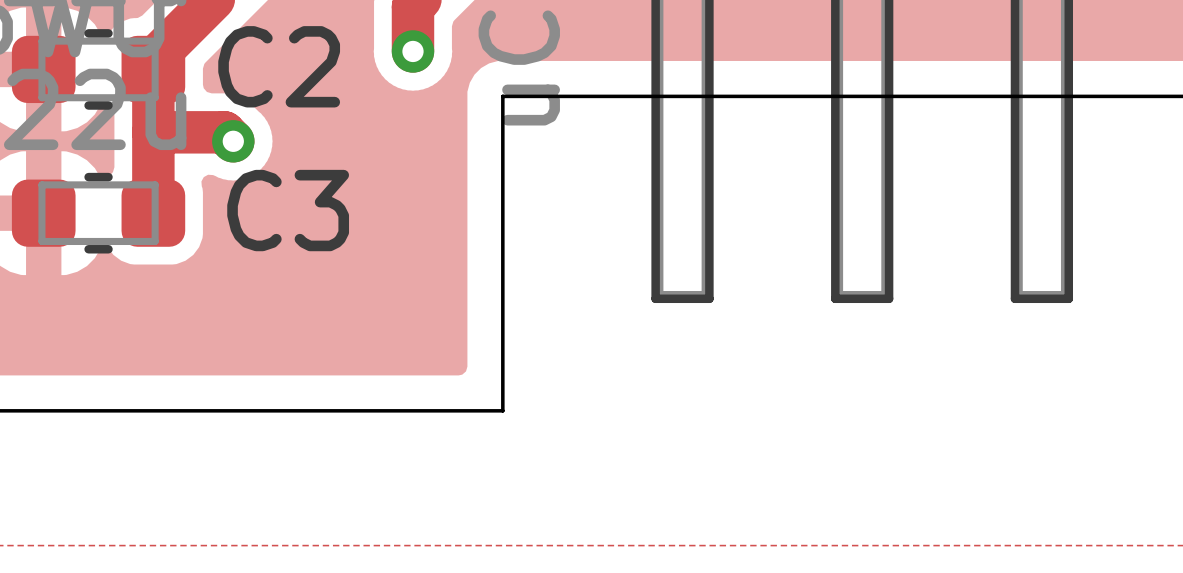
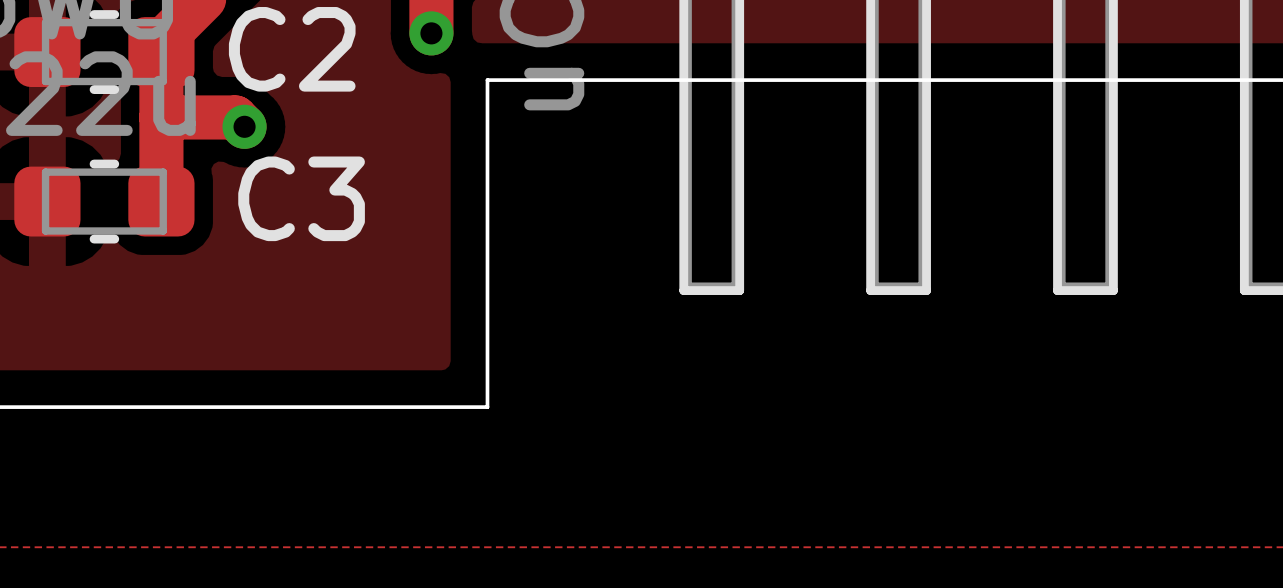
board edge: (502, 96) (502, 410) (466, 410) -> (524, 80) (487, 80) (487, 407)

